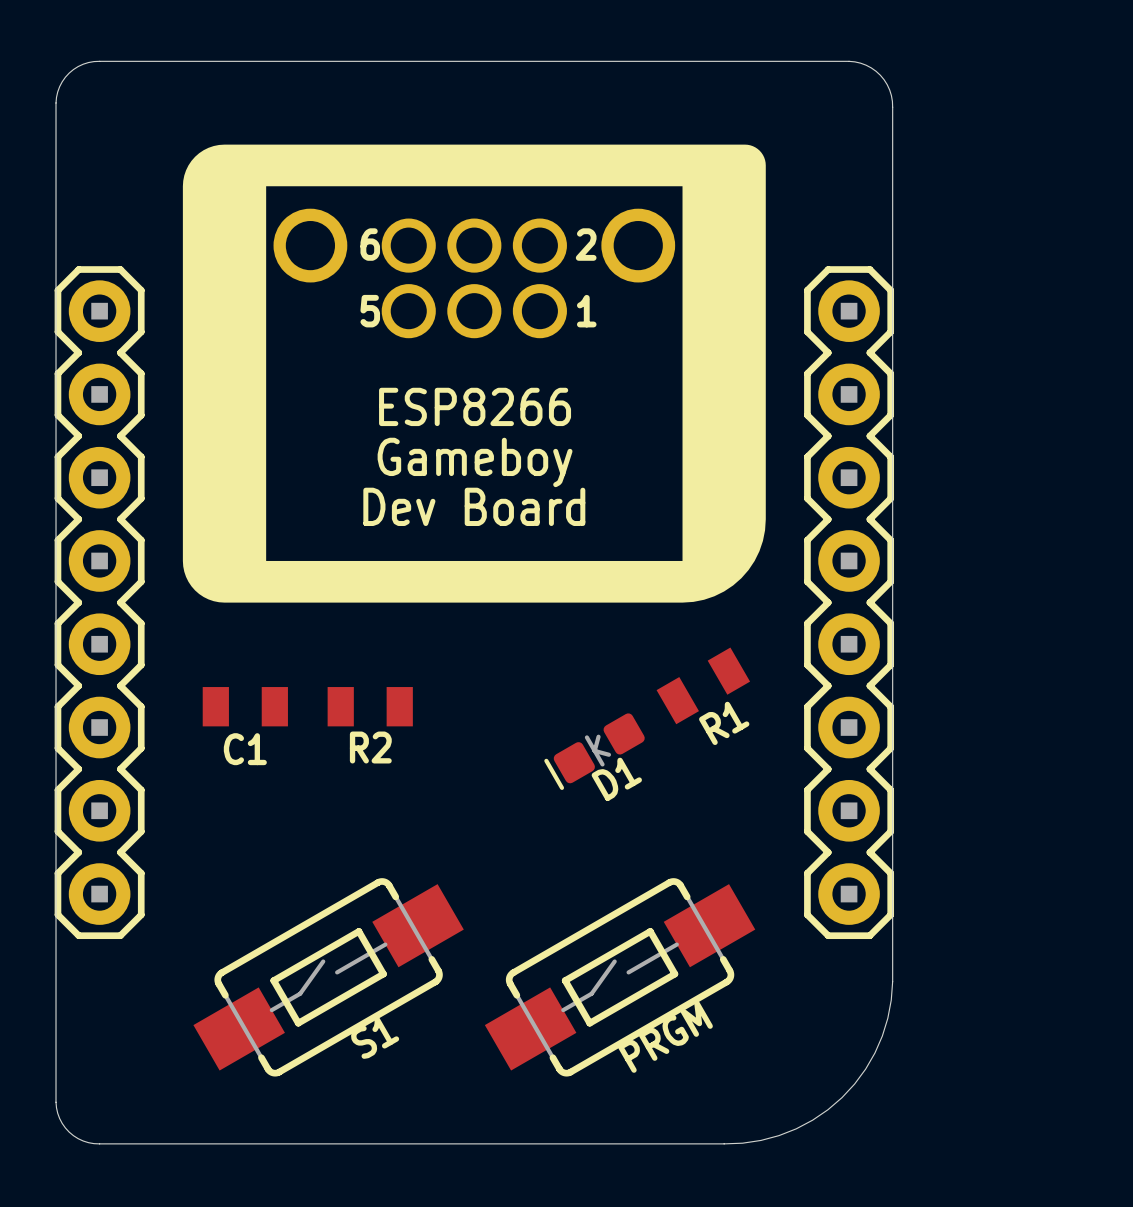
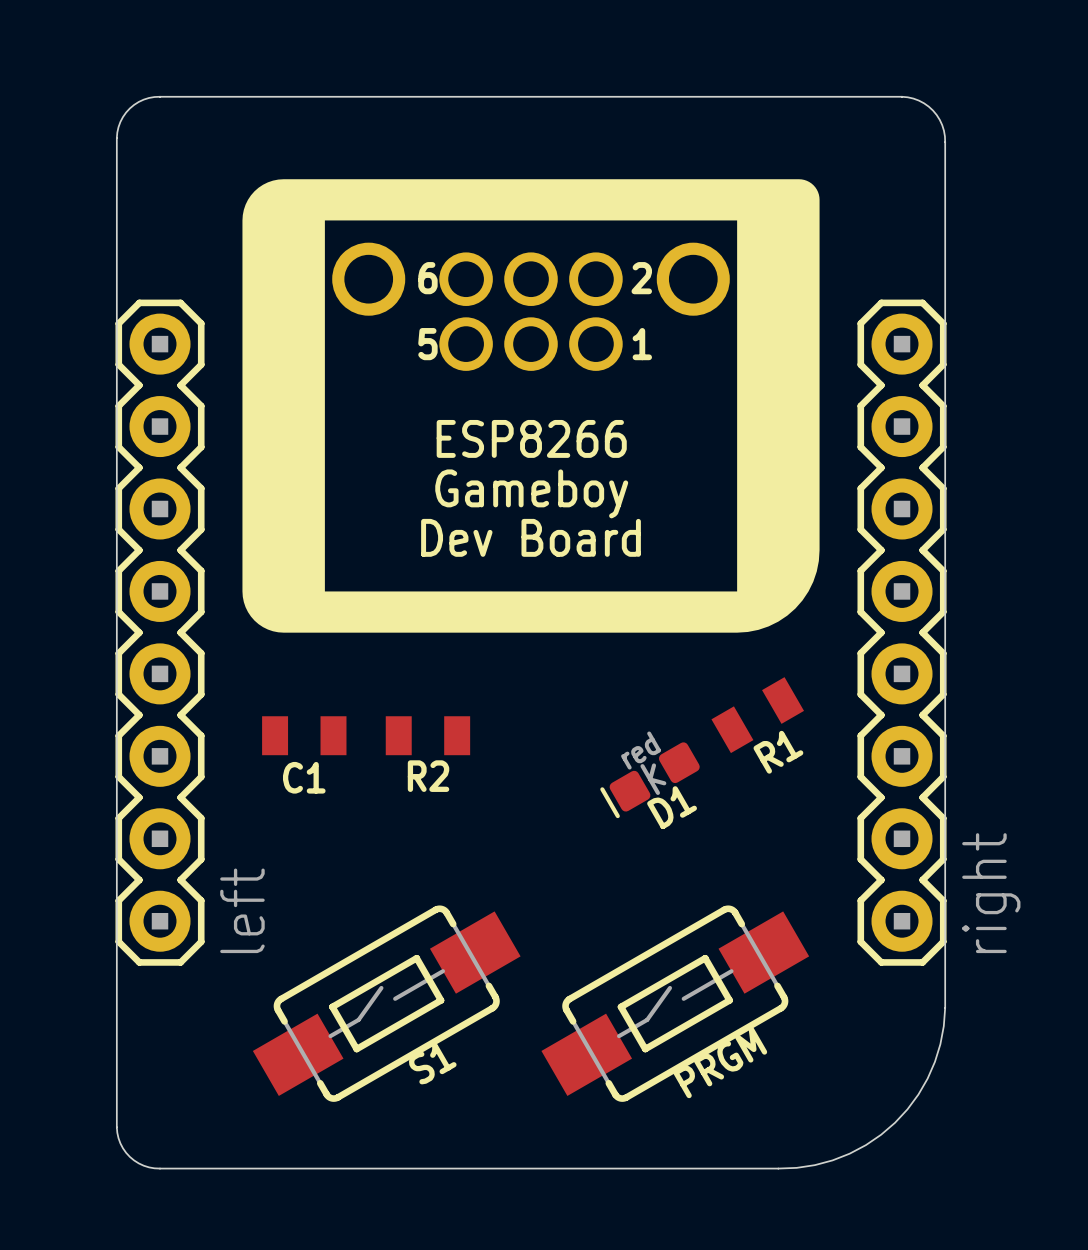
D1 value: none -> red (641, 750)
part value: none -> right (991, 893)
part value: none -> left (242, 910)

